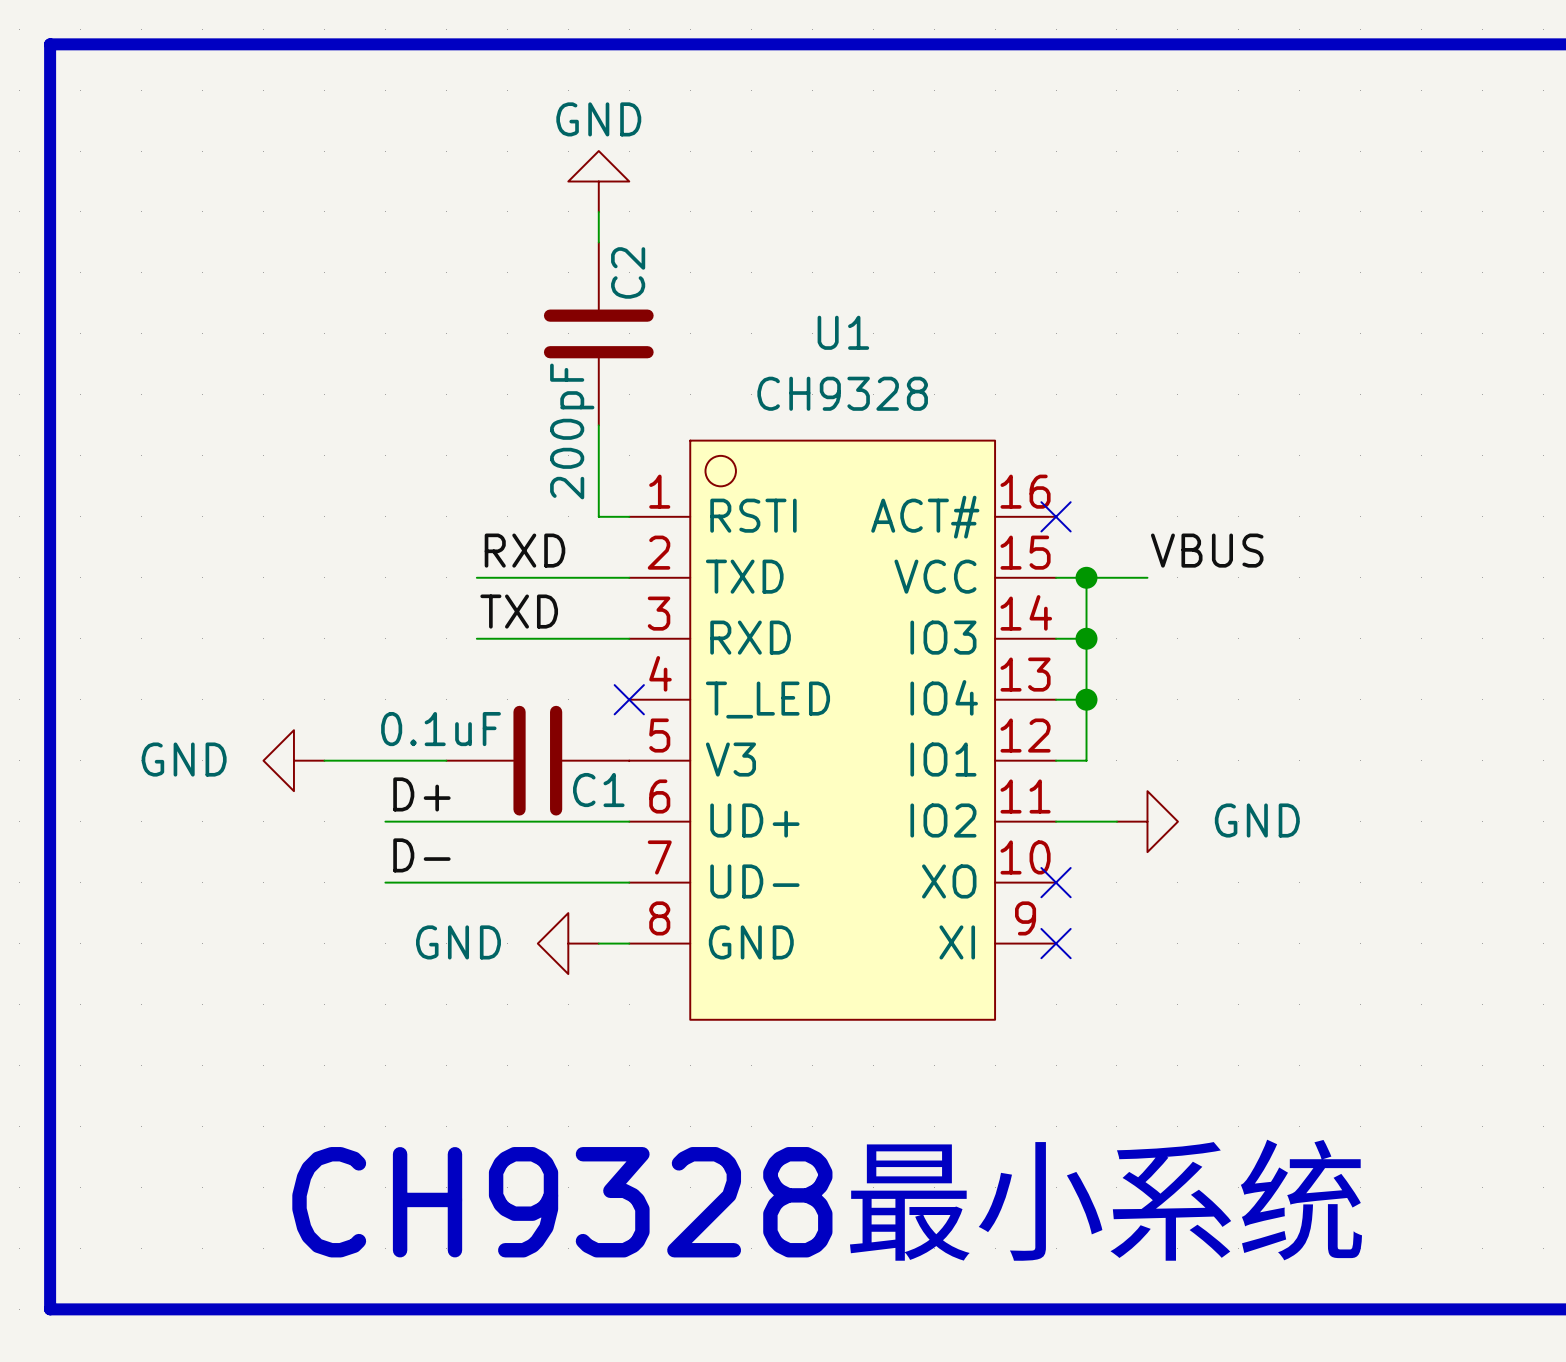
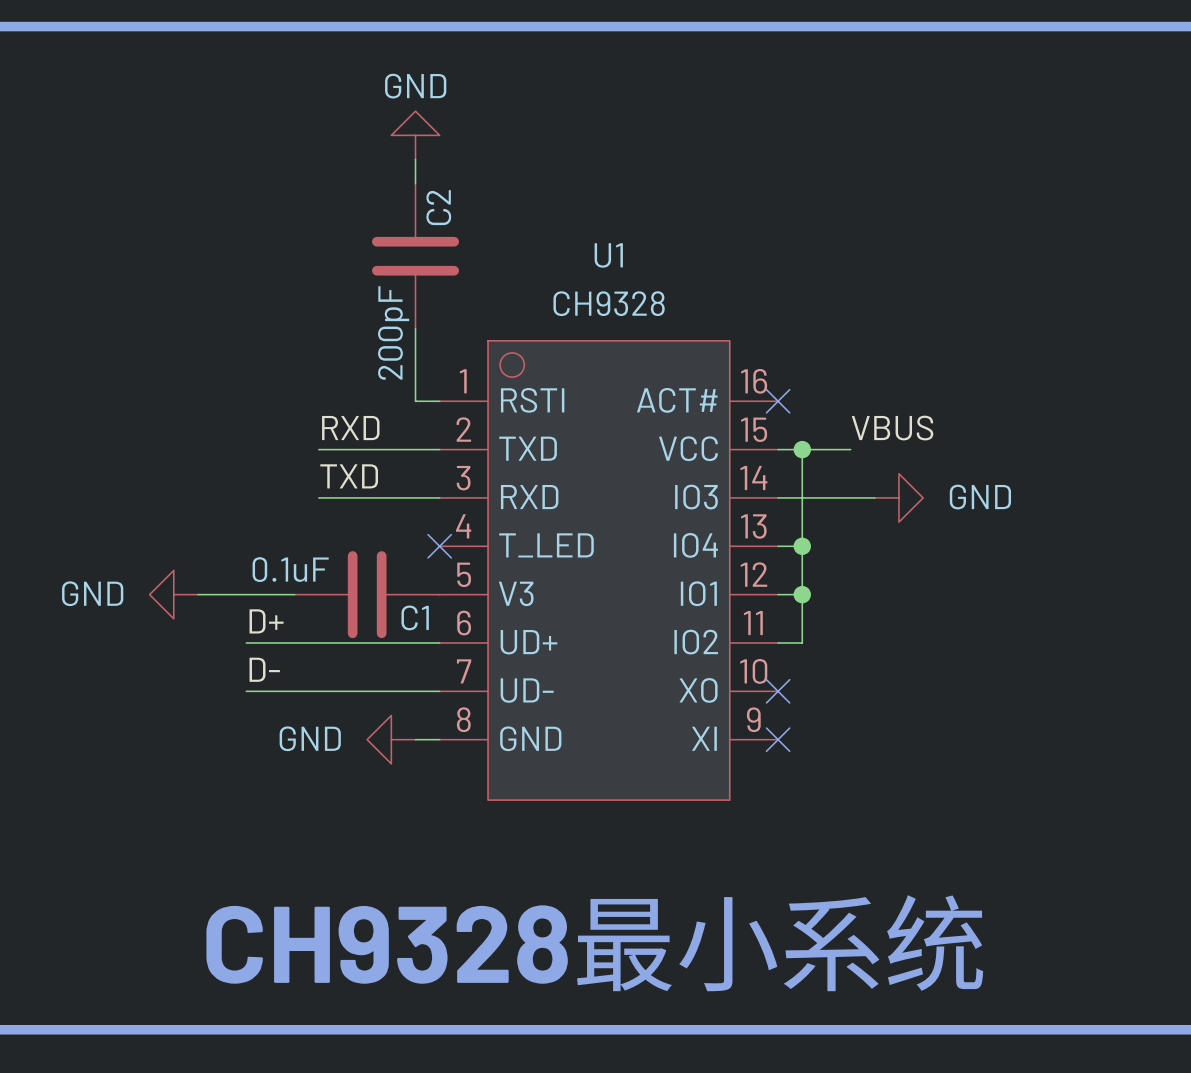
wire: none -> (802, 497) (874, 497)
junction position: (1086, 638) -> (802, 594)
wire: (1086, 821) (1116, 821) -> (802, 642) (802, 594)
power symbol position: GND (1147, 821) -> GND (898, 497)

